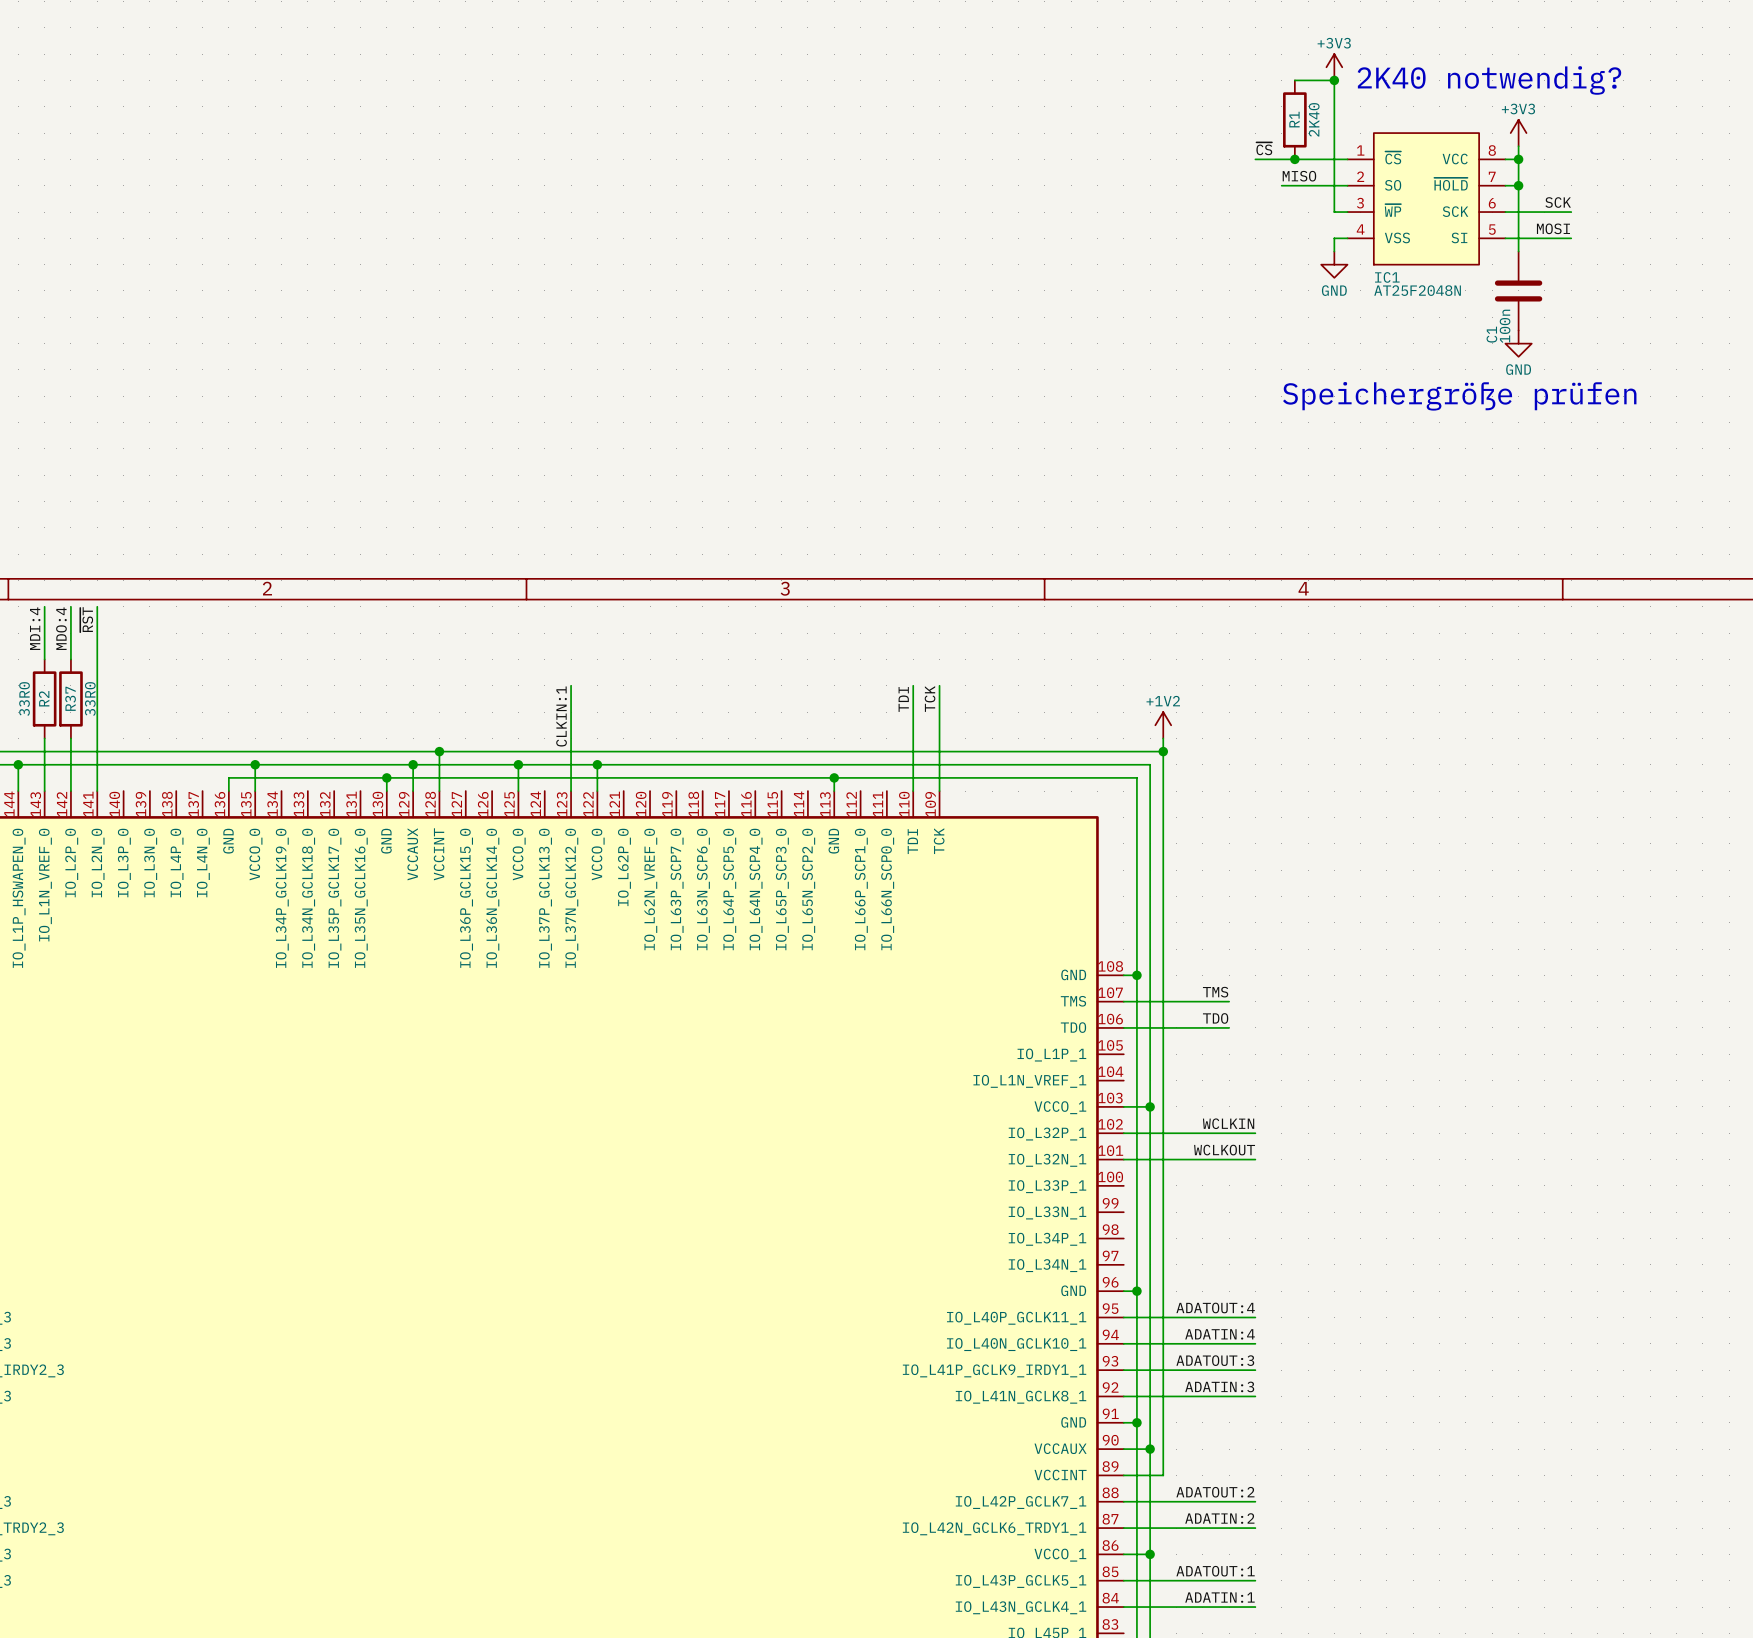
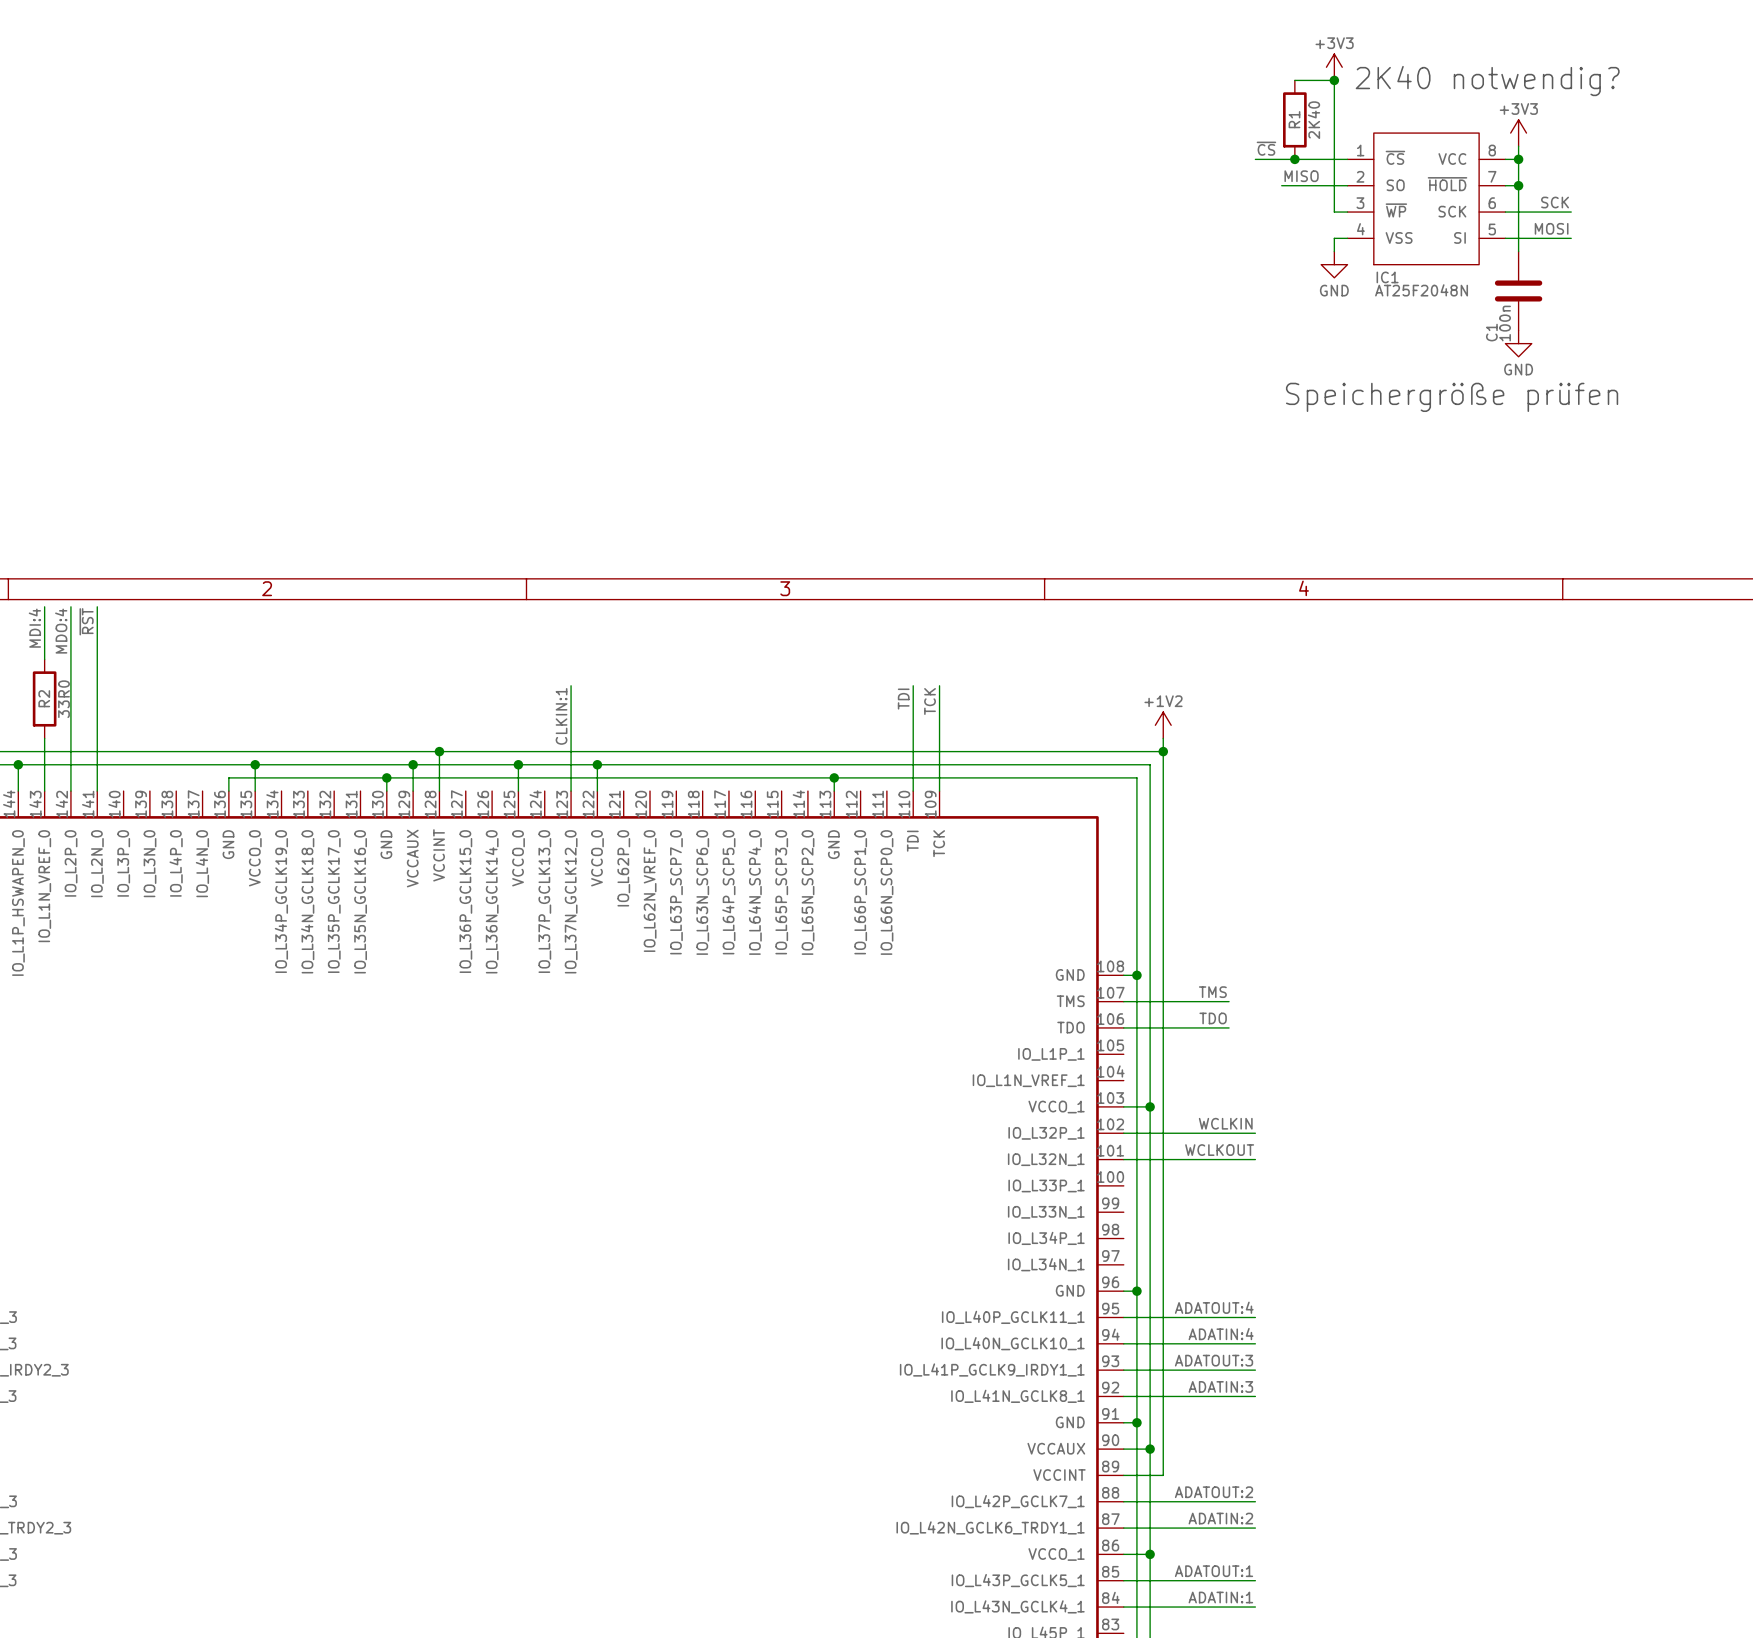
wire: none -> (70, 659) (70, 738)
R37: 33R0 (70, 698) -> none
R2 value position: 33R0 (24, 699) -> 33R0 (63, 699)

